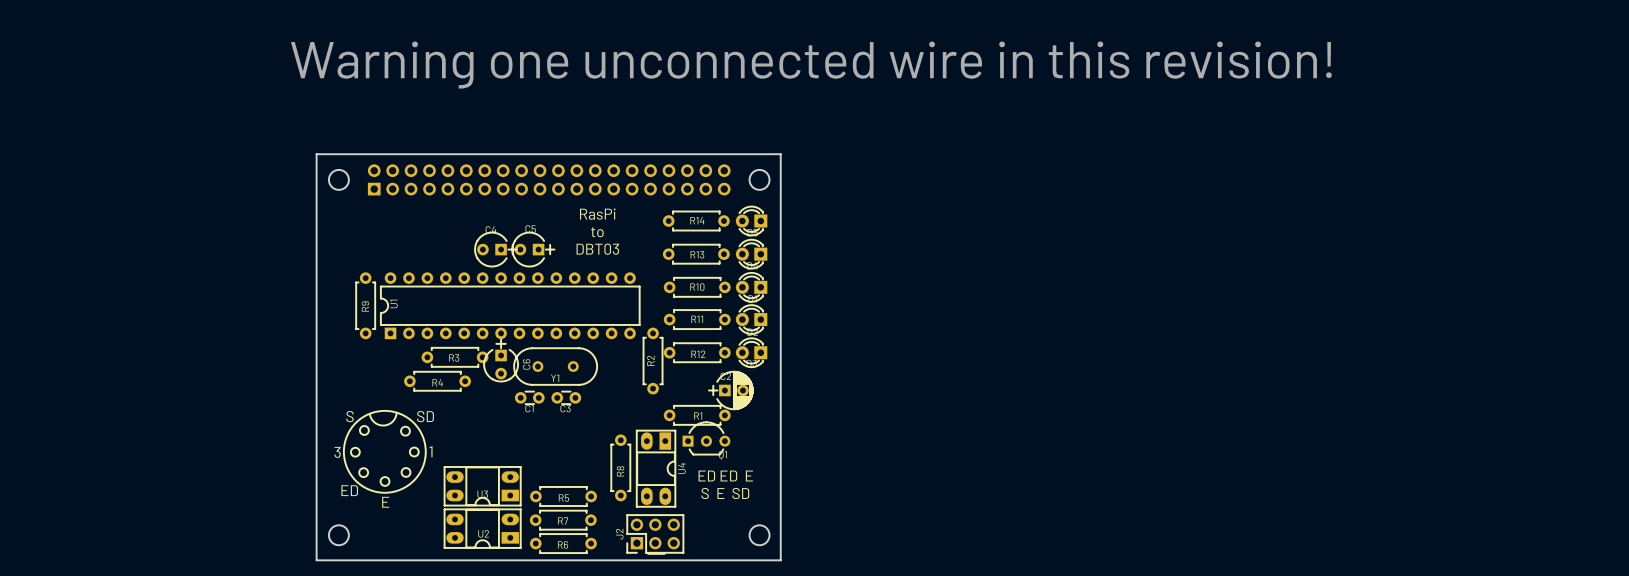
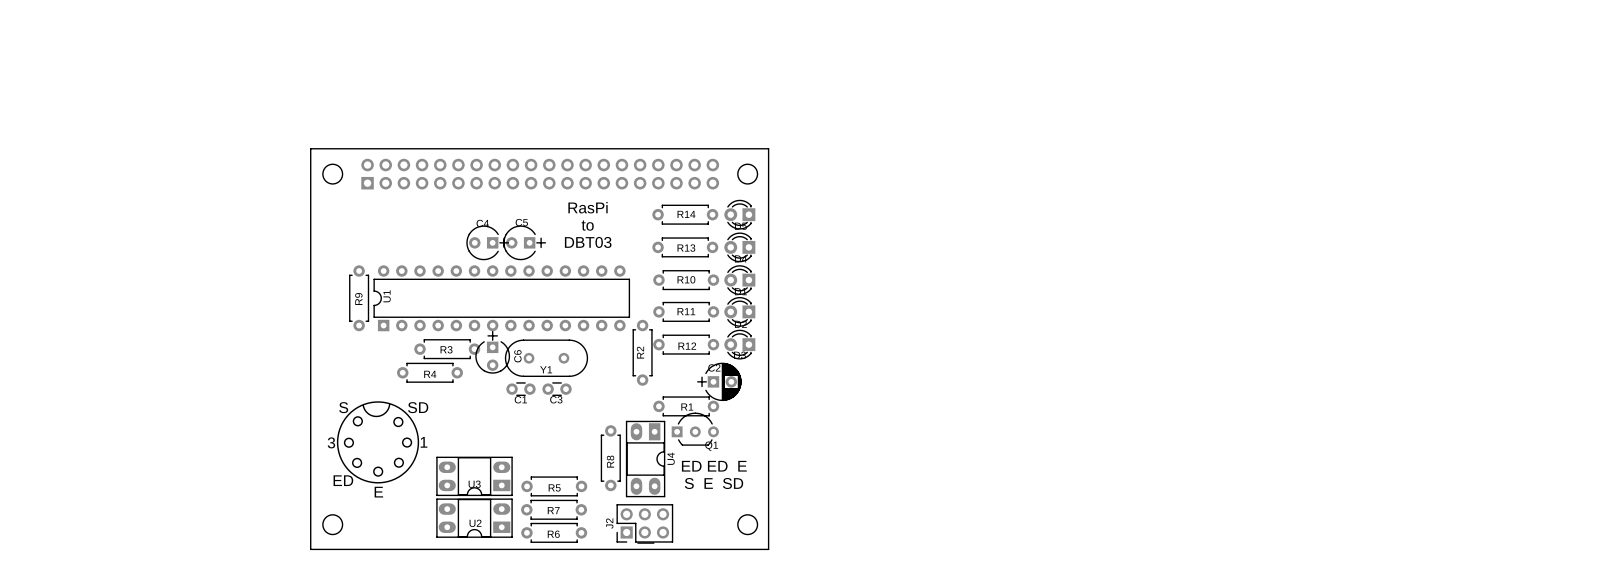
text: Warning one unconnected wire in this revision! (811, 65) -> none

